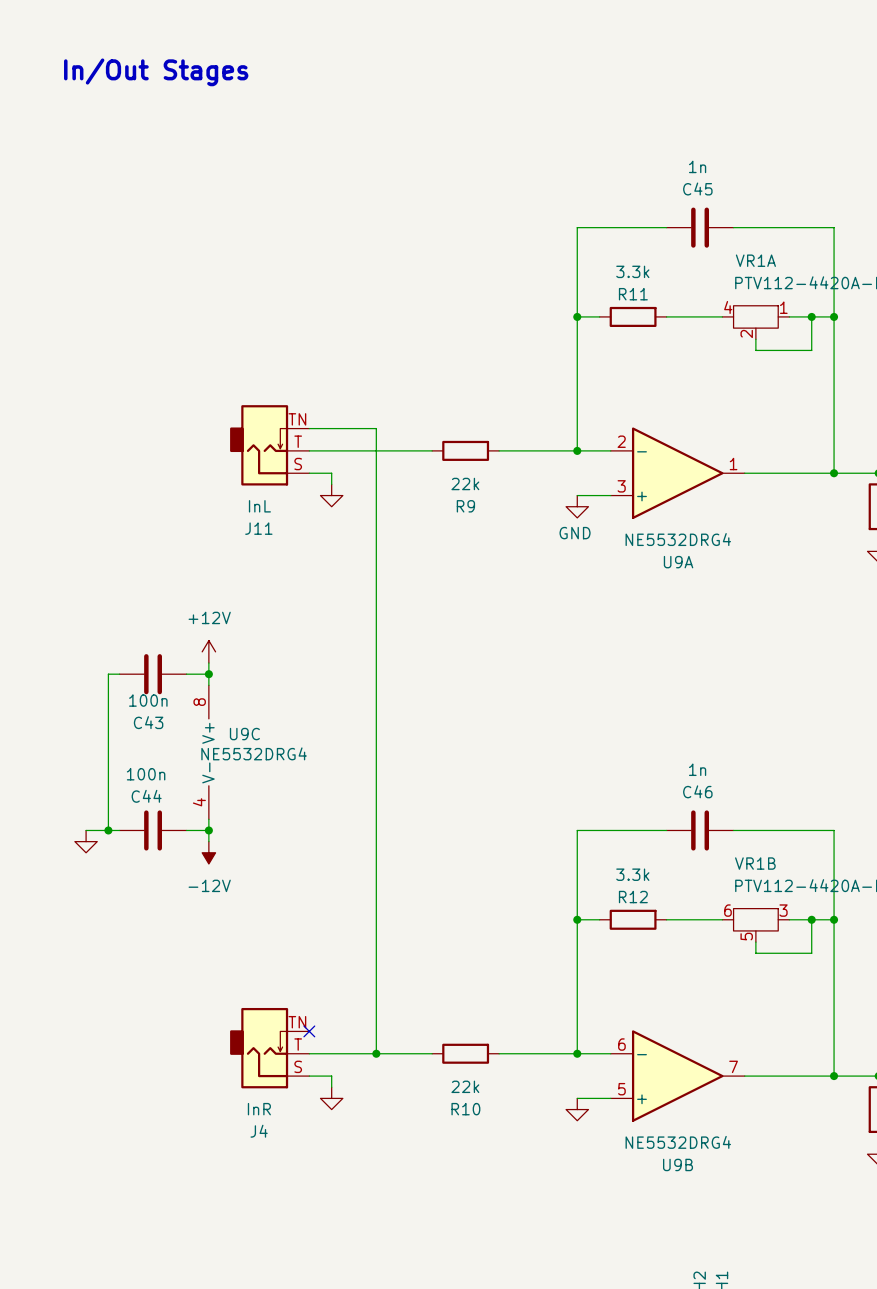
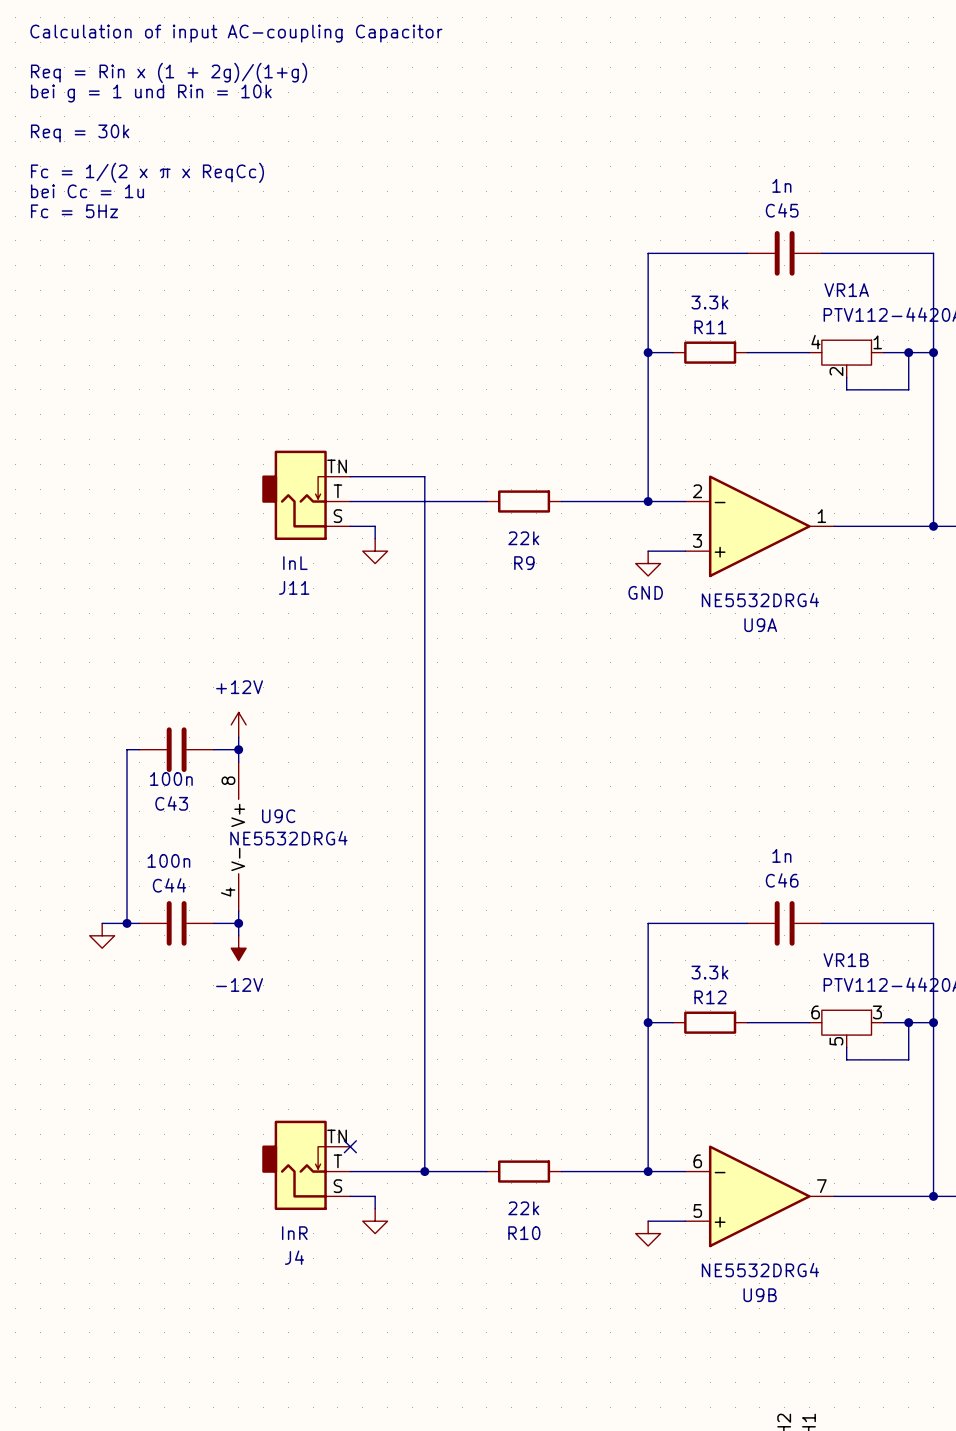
text: none -> Calculation of input AC-coupling Capacitor (236, 33)
text: none -> Req = Rin x (1 + 2g)/(1+g) (169, 72)
text: In/Out Stages (156, 72) -> none
text: none -> bei g = 1 und Rin = 10k (151, 93)
text: none -> Req = 30k (80, 133)
text: none -> Fc = 1/(2 x π x ReqCc) (147, 172)
text: none -> bei Cc = 1u (87, 191)
text: none -> Fc = 5Hz (74, 211)

